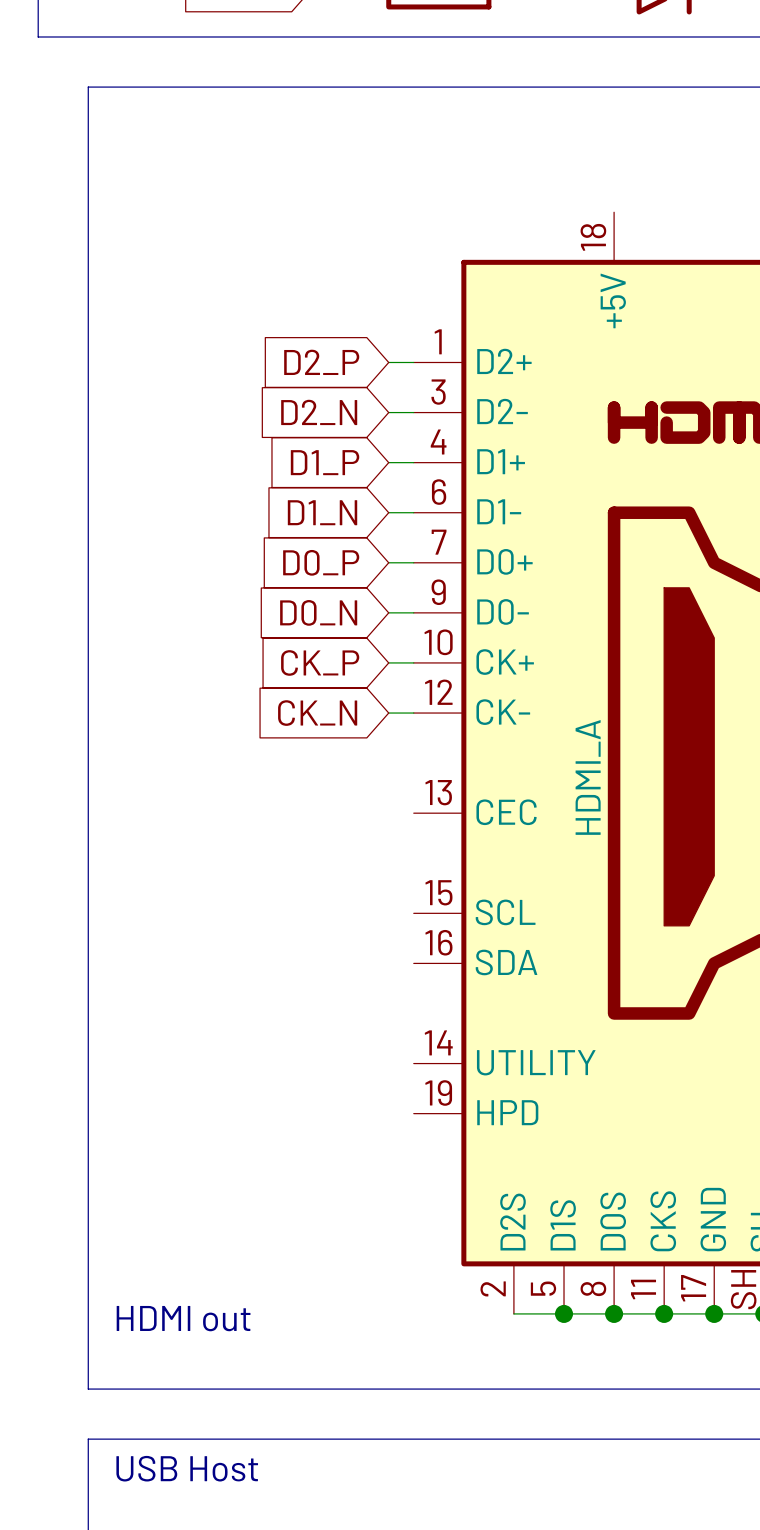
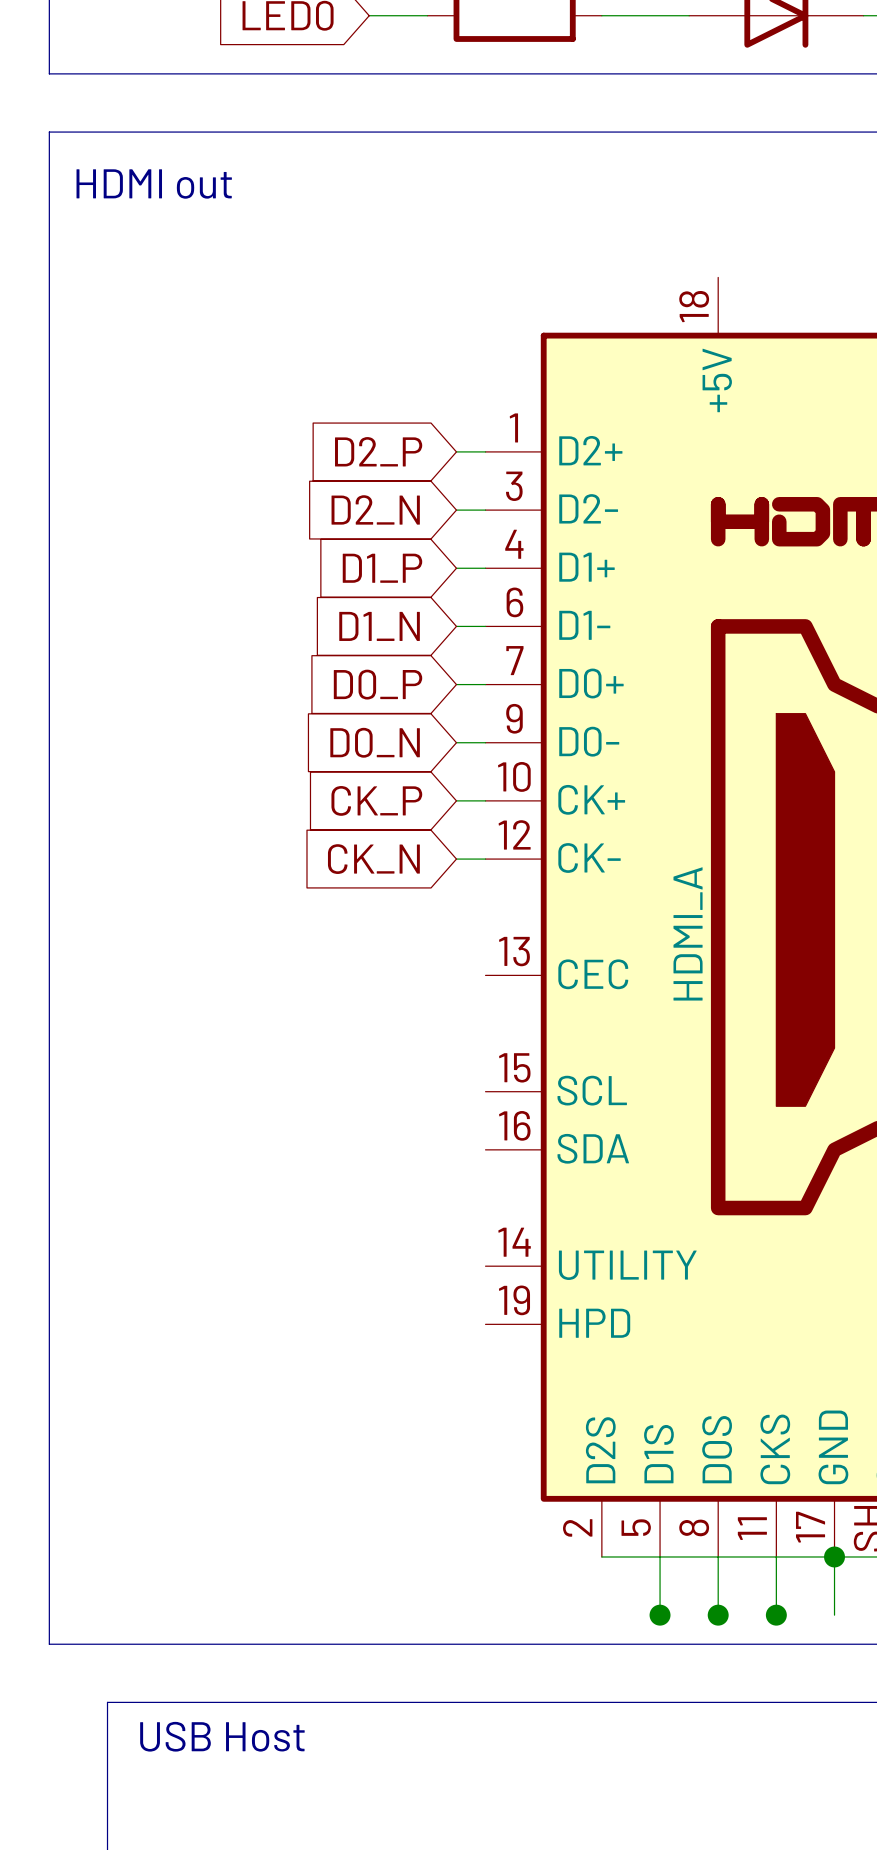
line: (88, 87) (88, 1389) -> (107, 132) (49, 132) (49, 1644) (107, 1644)
text: none -> HDMI out (154, 184)
wire: none -> (660, 1556) (660, 1615)
junction: (564, 1313) -> none
wire: none -> (718, 1556) (718, 1615)
junction: (614, 1313) -> none
wire: none -> (776, 1556) (776, 1615)
junction: (664, 1313) -> none
wire: none -> (834, 1556) (834, 1615)
text: HDMI out (183, 1318) -> none
junction: none -> (660, 1615)
junction: none -> (718, 1615)
junction: none -> (776, 1615)

